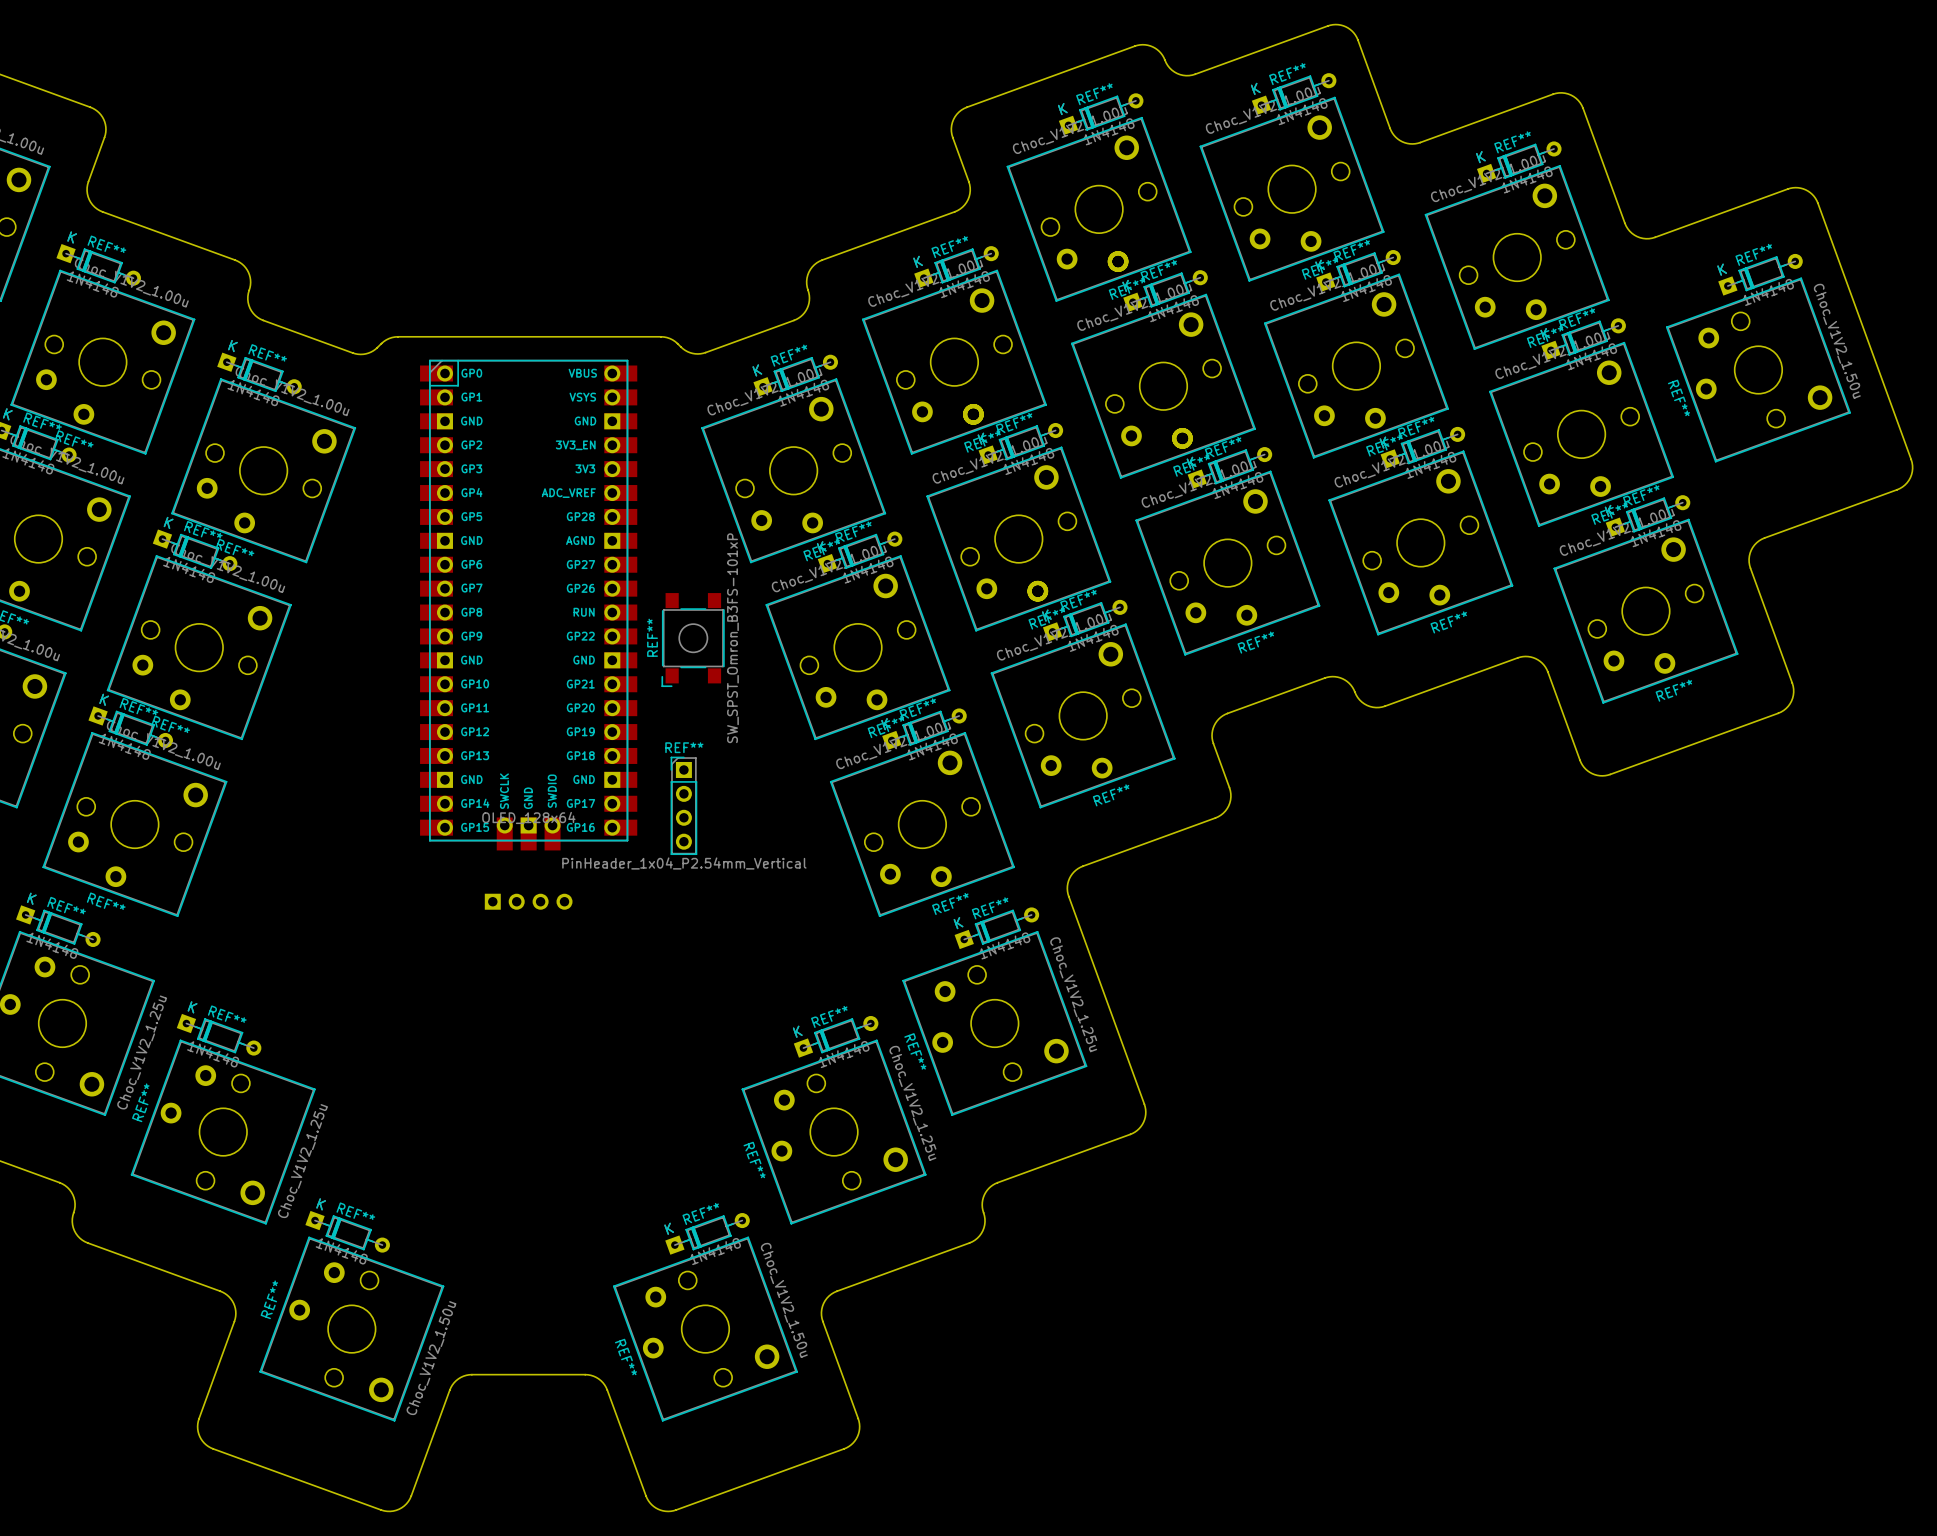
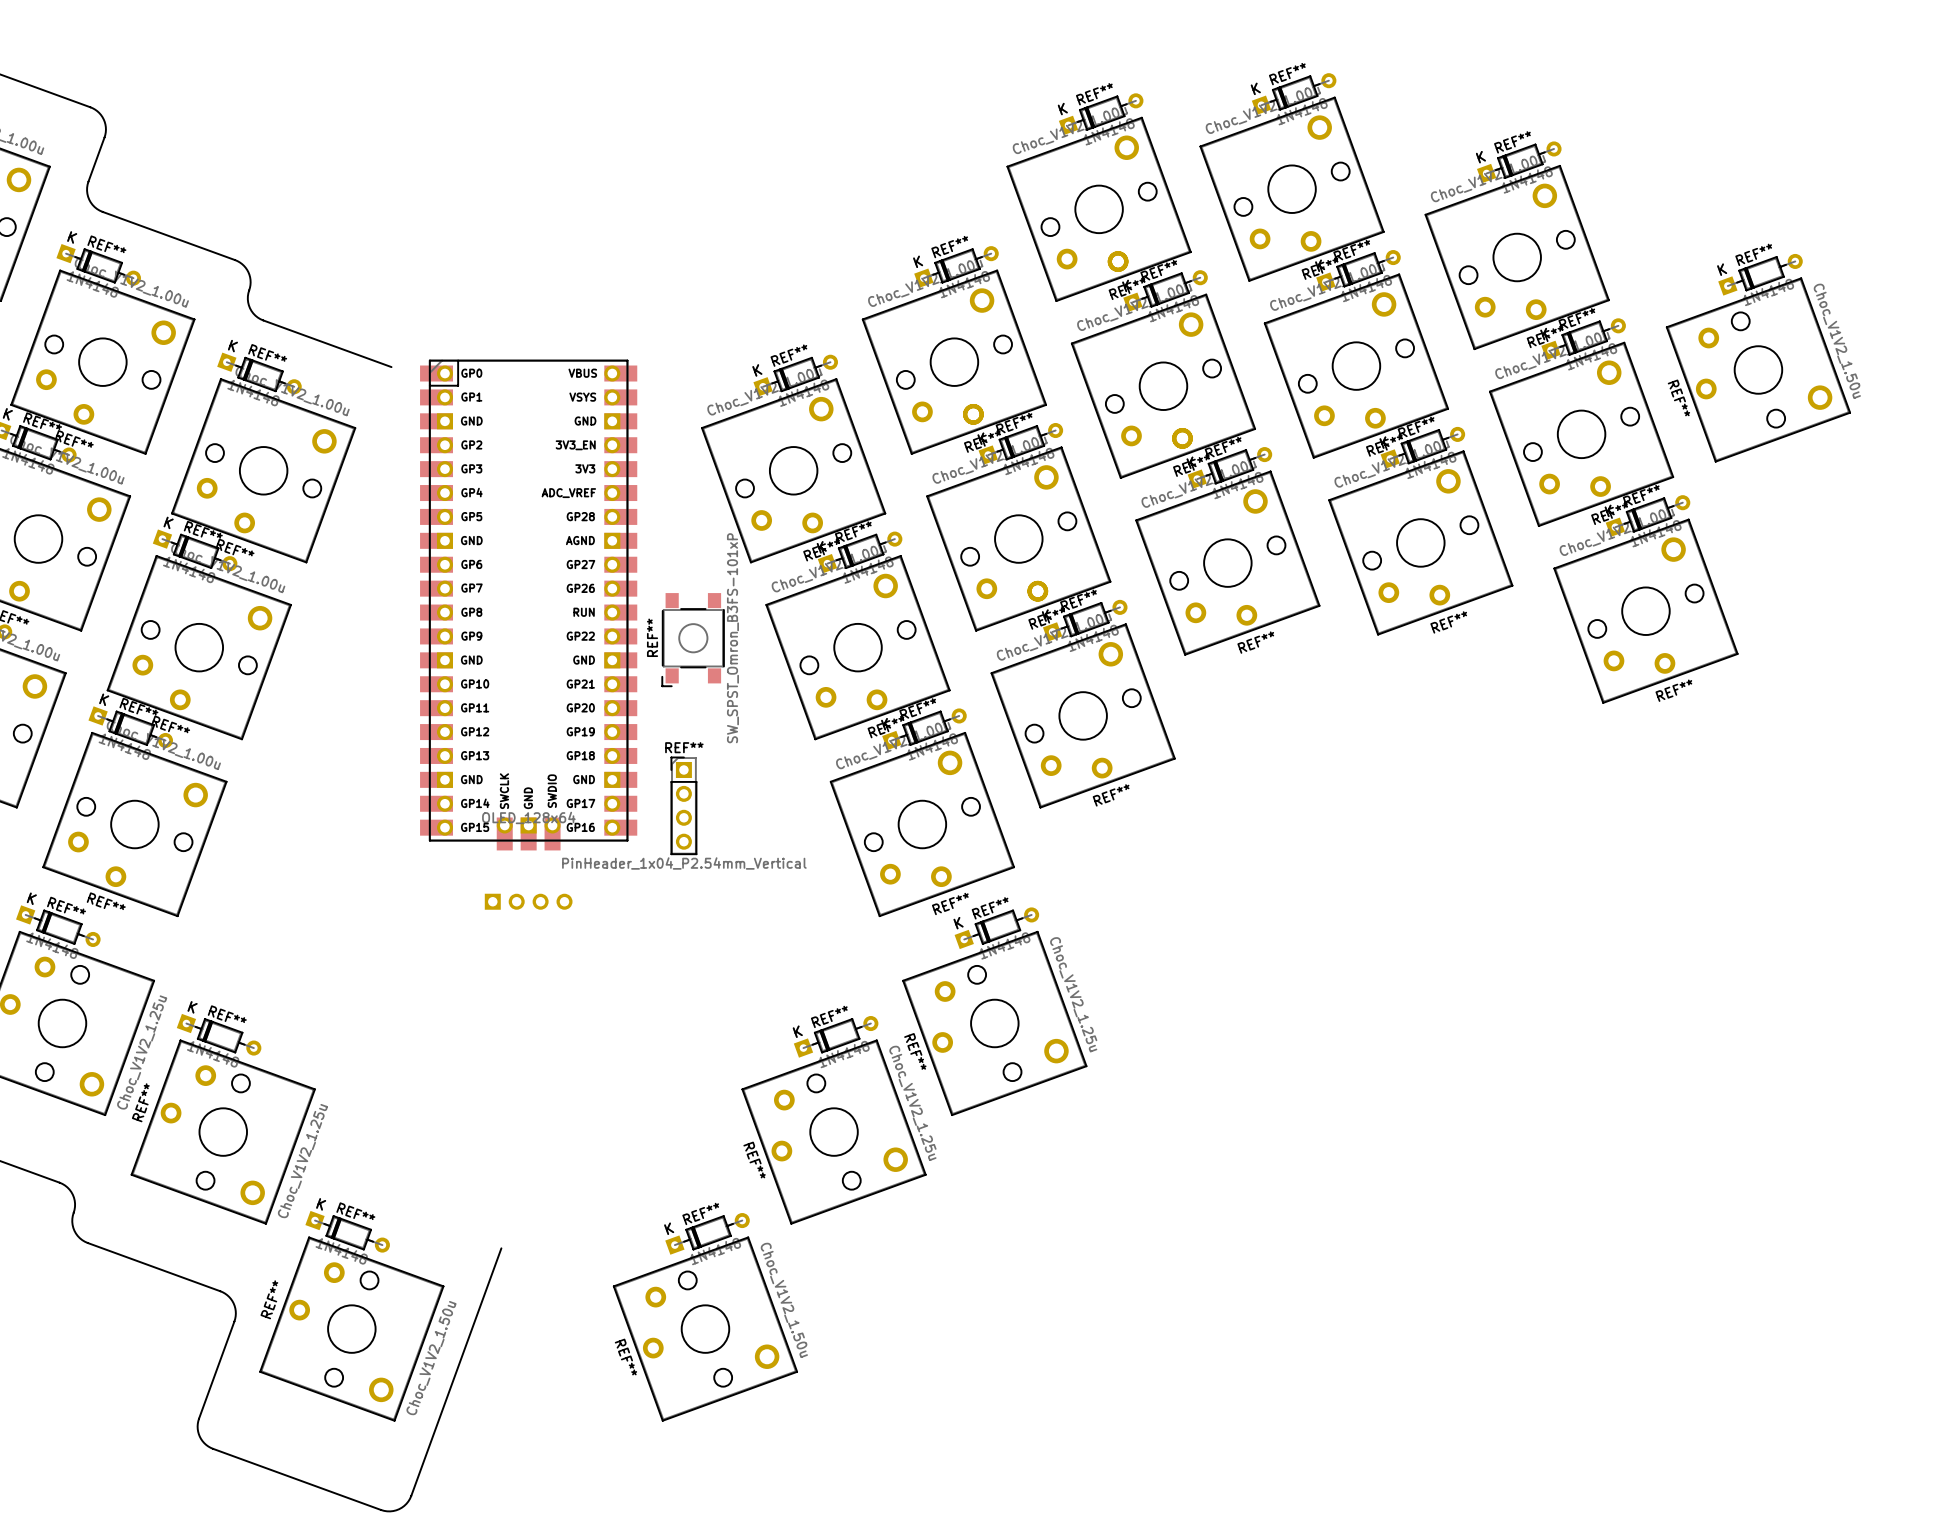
board edge: (352, 353) (368, 353) (386, 339) (397, 336) (660, 336) (672, 339) (690, 352) (705, 352) (800, 316) (808, 303) (807, 275) (812, 267) (819, 261) (954, 211) (962, 207) (968, 199) (970, 187) (951, 128) (955, 116) (963, 108) (1137, 45) (1145, 44) (1155, 48) (1161, 53) (1171, 70) (1180, 74) (1189, 75) (1327, 26) (1338, 24) (1350, 29) (1356, 37) (1391, 130) (1395, 137) (1404, 142) (1420, 142) (1555, 93) (1565, 93) (1573, 96) (1583, 108) (1626, 226) (1631, 233) (1639, 237) (1655, 237) (1790, 188) (1800, 188) (1810, 192) (1817, 203) (1912, 465) (1910, 477) (1899, 488) (1764, 538) (1756, 542) (1751, 550) (1749, 559) (1750, 568) (1793, 686) (1791, 701) (1786, 708) (1778, 713) (1602, 775) (1589, 772) (1582, 765) (1546, 669) (1538, 659) (1528, 656) (1517, 657) (1382, 707) (1372, 707) (1364, 703) (1347, 681) (1337, 677) (1329, 676) (1227, 713) (1218, 719) (1213, 728) (1212, 738) (1230, 790) (1229, 802) (1225, 811) (1215, 817) (1080, 867) (1072, 873) (1067, 883) (1068, 896) (1144, 1104) (1145, 1114) (1143, 1122) (1137, 1130) (1130, 1134) (992, 1185) (987, 1190) (982, 1199) (983, 1227) (979, 1236) (972, 1241) (836, 1291) (826, 1298) (821, 1309) (821, 1318) (859, 1423) (857, 1436) (848, 1446) (676, 1510) (665, 1511) (655, 1507) (647, 1498) (607, 1390) (602, 1382) (596, 1377) (585, 1374) (469, 1374) (456, 1380) (449, 1390) -> (501, 1248) (449, 1390)

